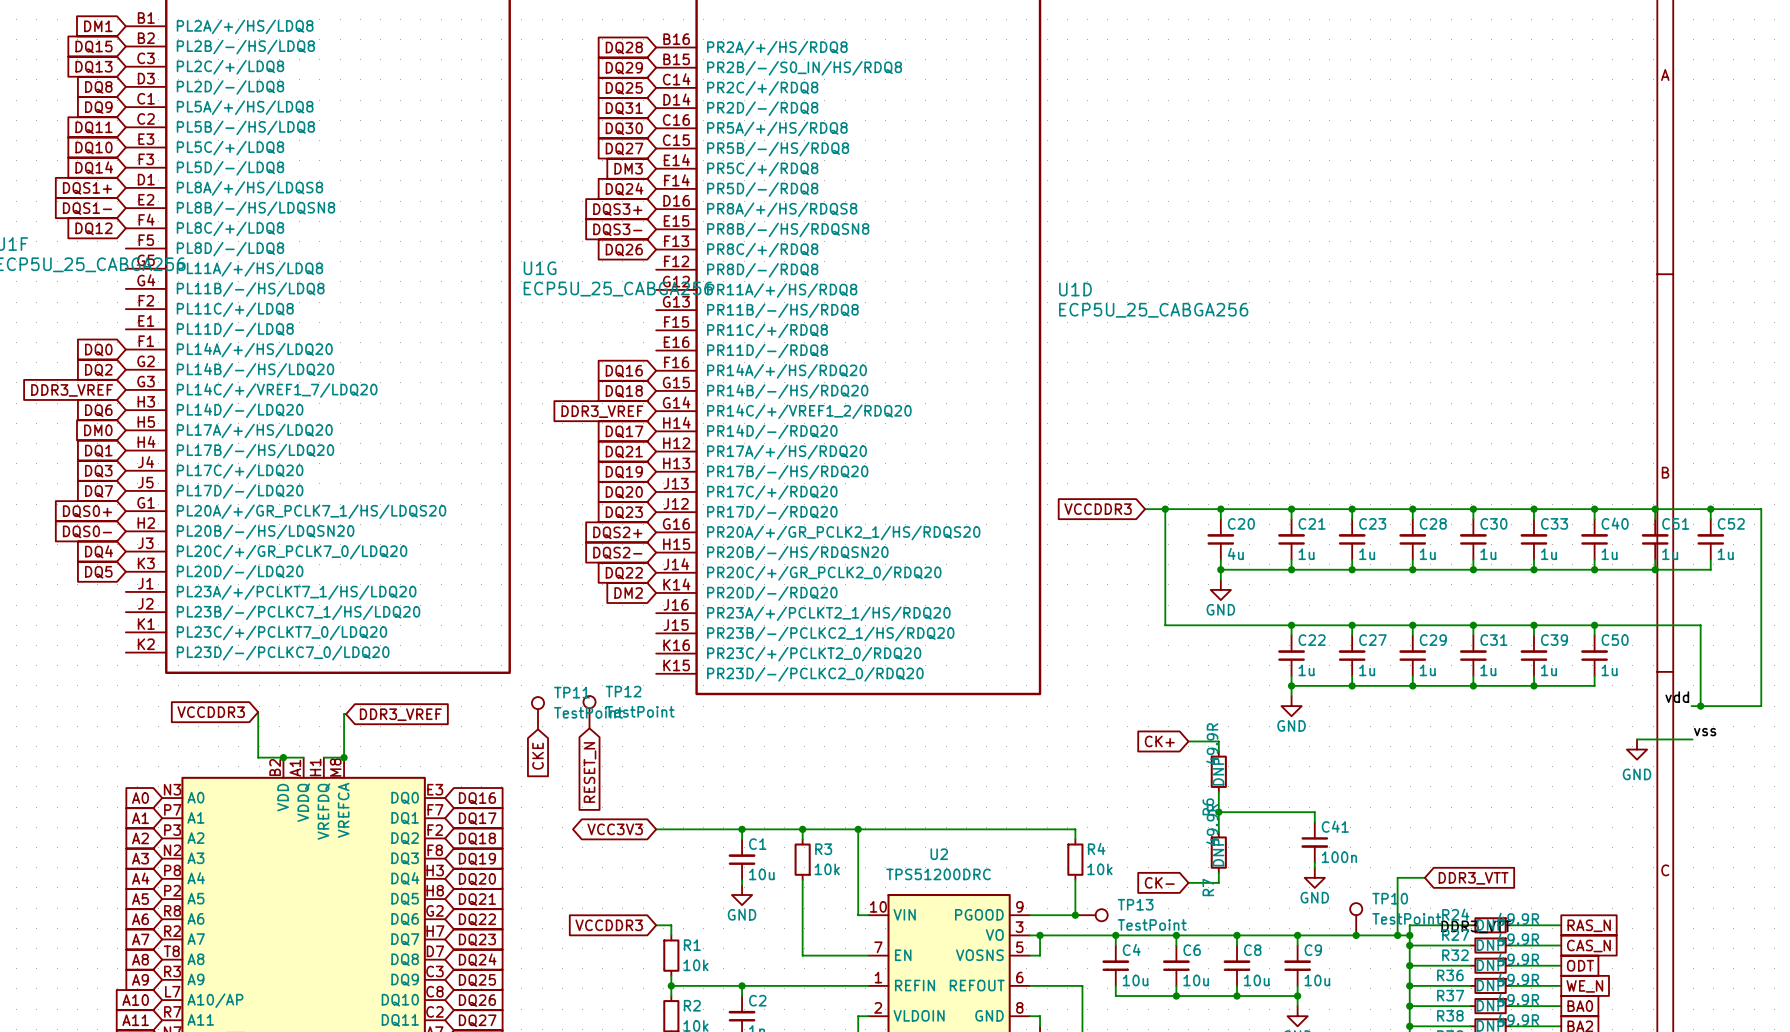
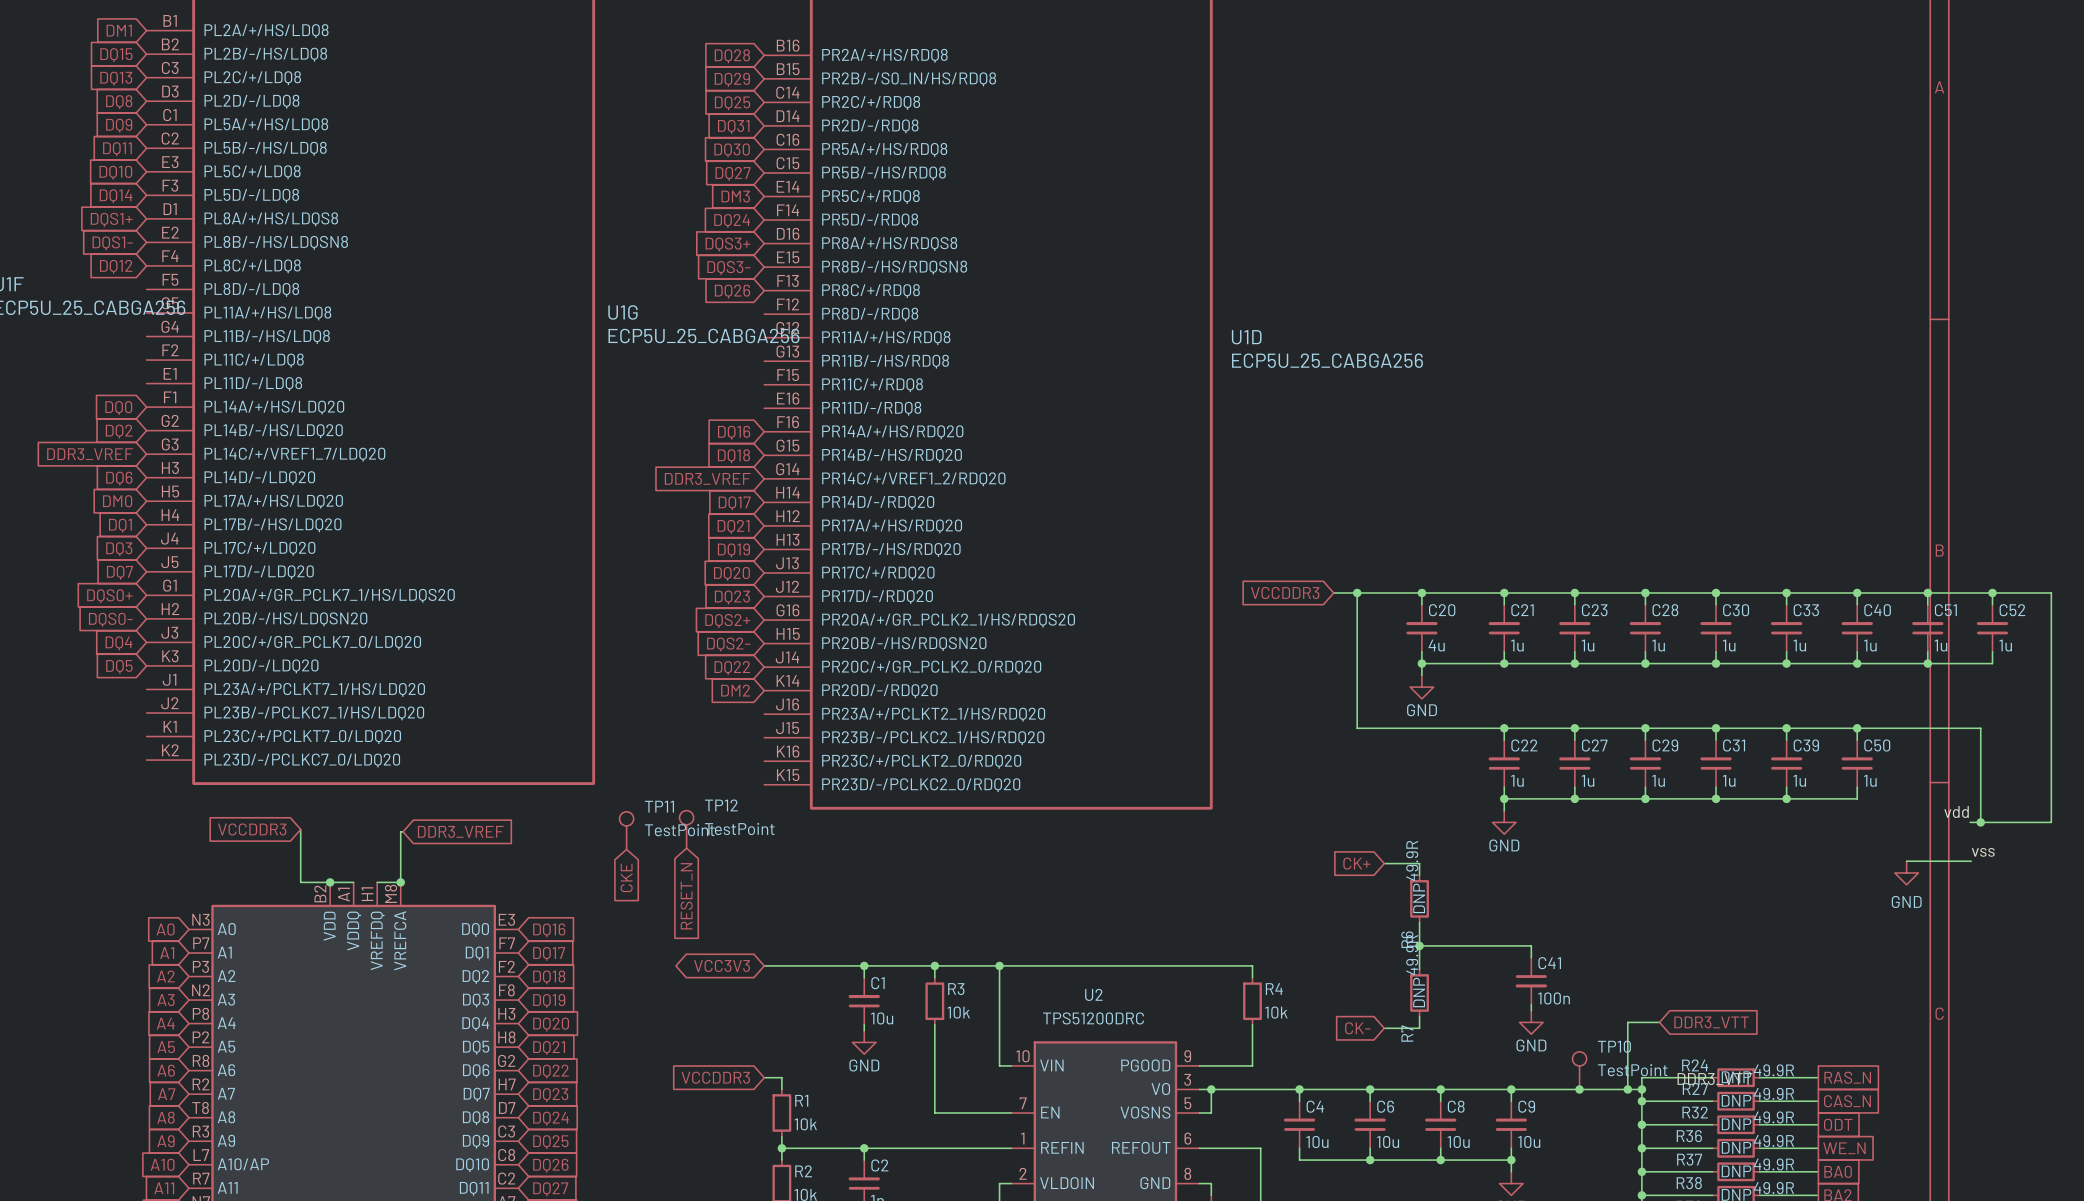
junction: (1075, 915) -> none
TP13: TestPoint (1091, 915) -> none

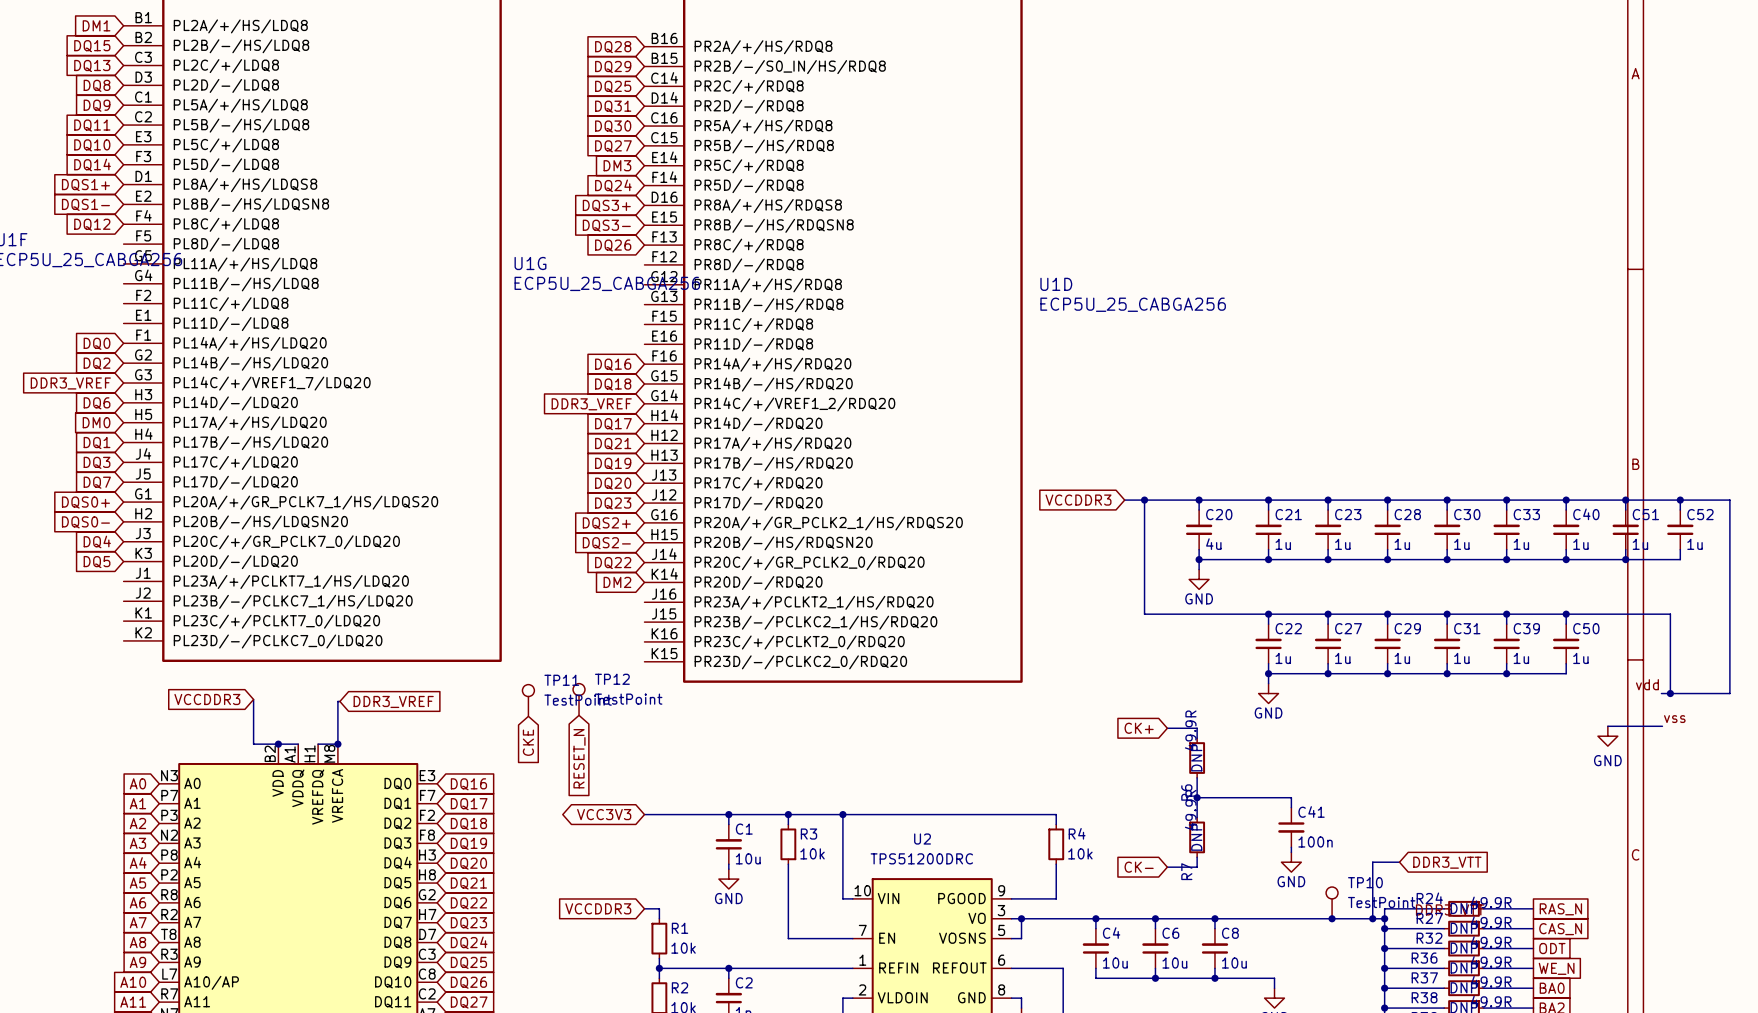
wire: (1511, 1089) (1511, 1101) -> none
junction: (1511, 1089) -> none
C9: (1511, 1124) -> none
wire: (1511, 1148) (1511, 1160) -> none
junction: (1511, 1160) -> none

